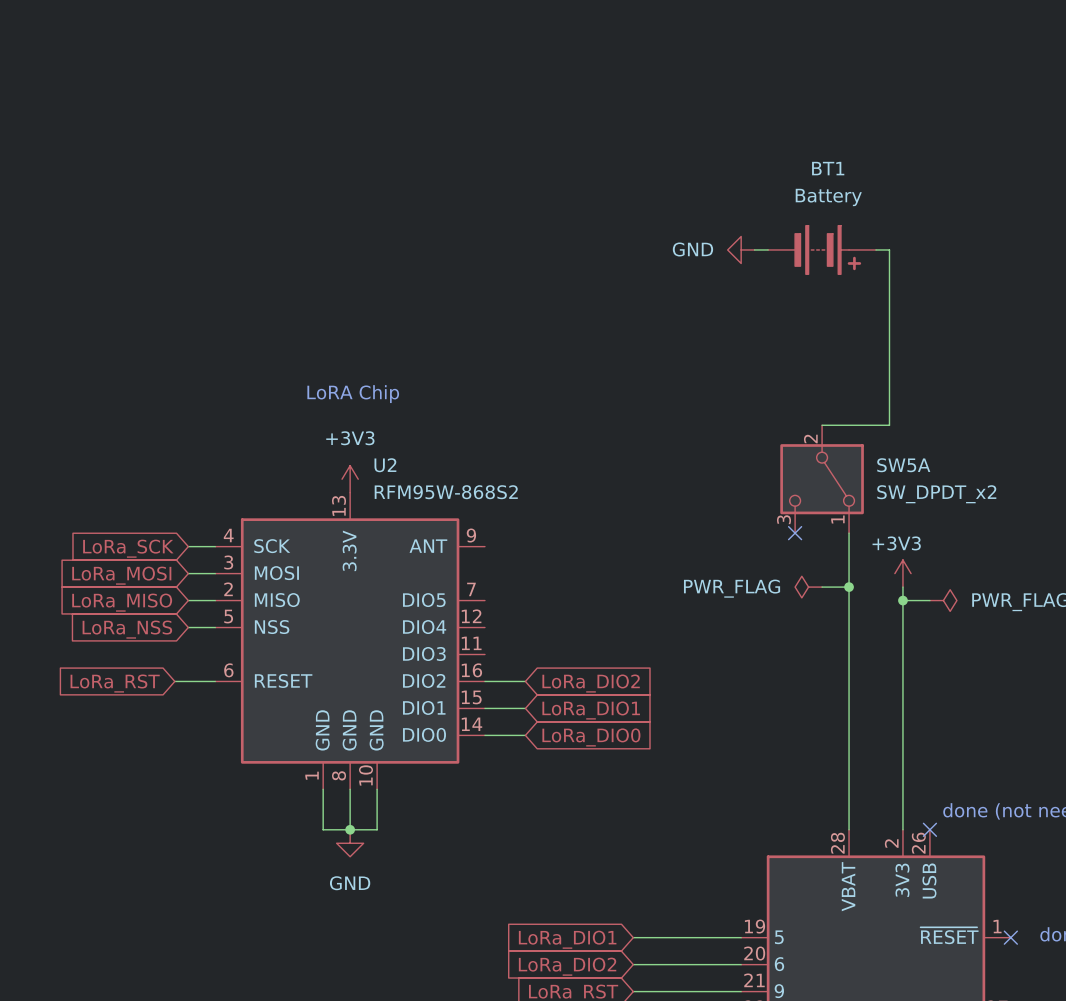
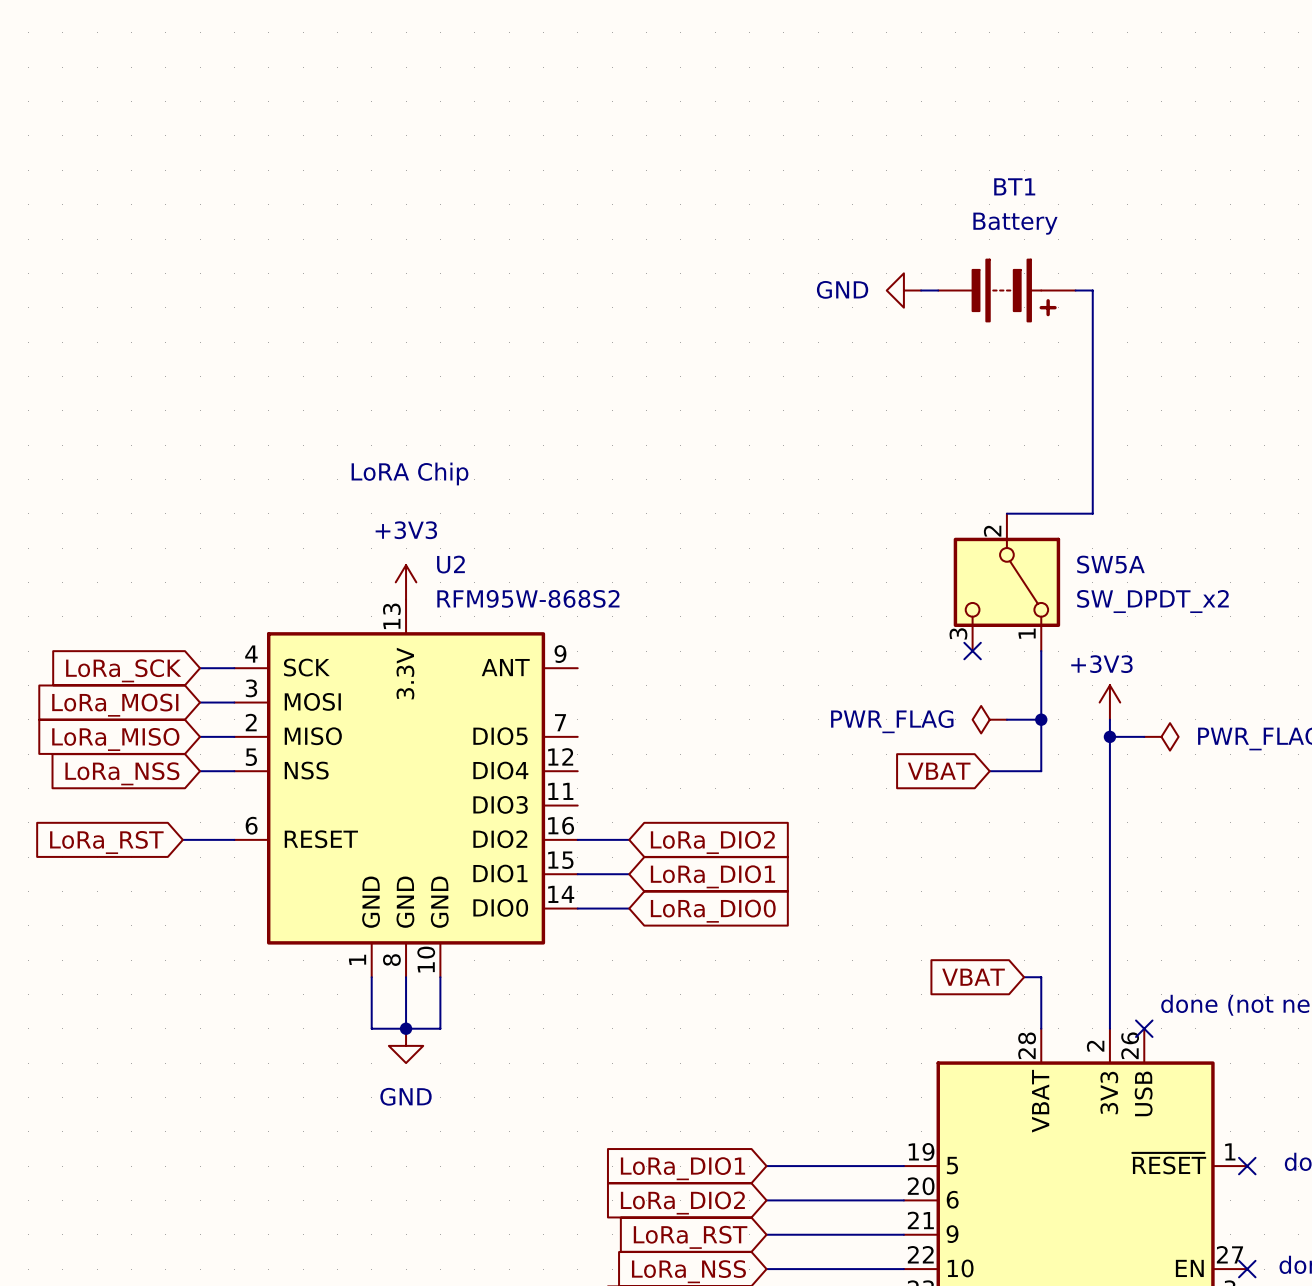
global label: none -> VBAT (939, 771)
wire: none -> (989, 771) (1041, 771)
wire: (849, 627) (849, 789) -> (1024, 977) (1041, 977)
global label: none -> VBAT (973, 977)

